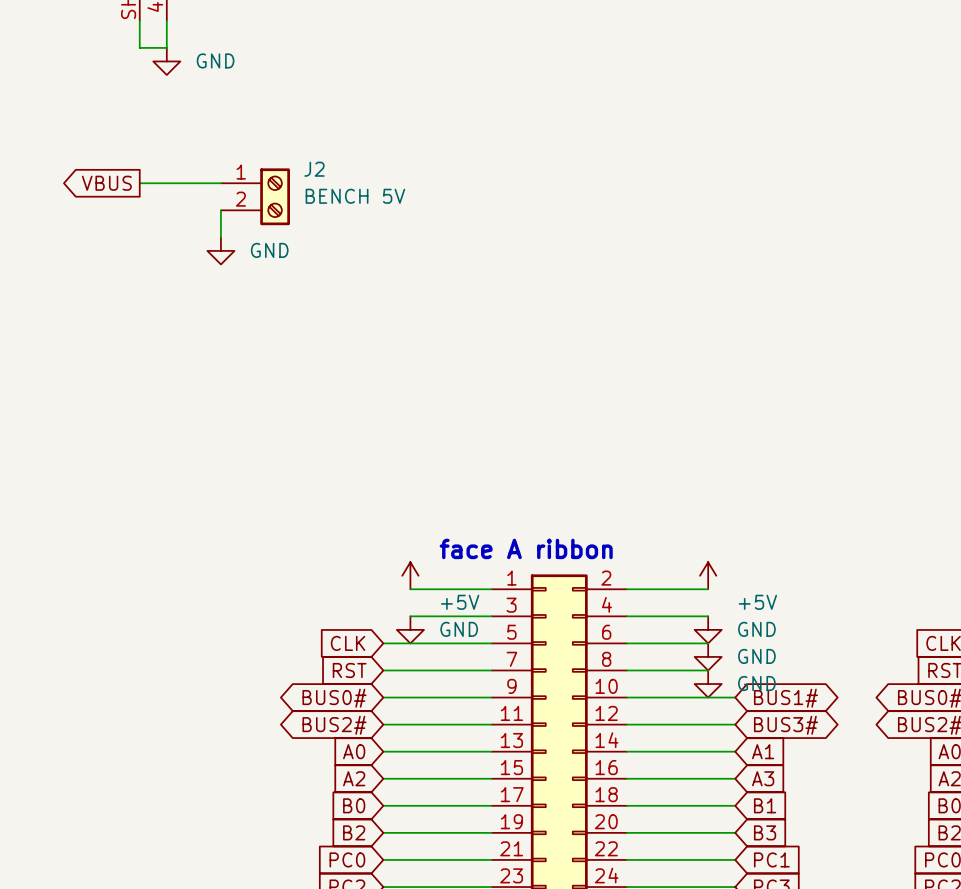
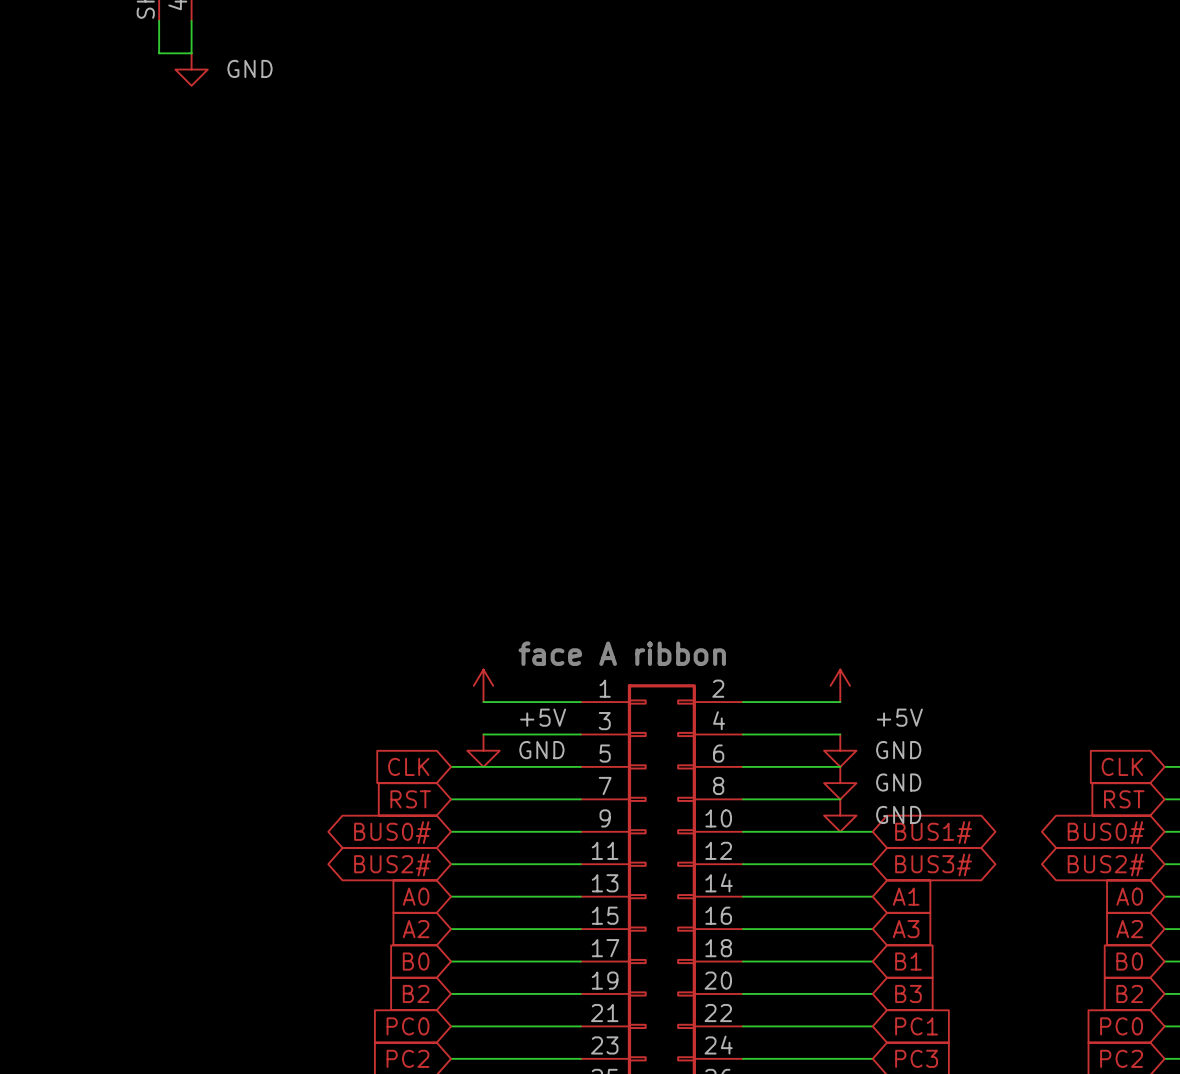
global label: VBUS (106, 183) -> none
wire: (139, 183) (220, 183) -> none
J2: BENCH 5V (255, 196) -> none
wire: (220, 210) (220, 237) -> none
power symbol: GND (220, 250) -> none

